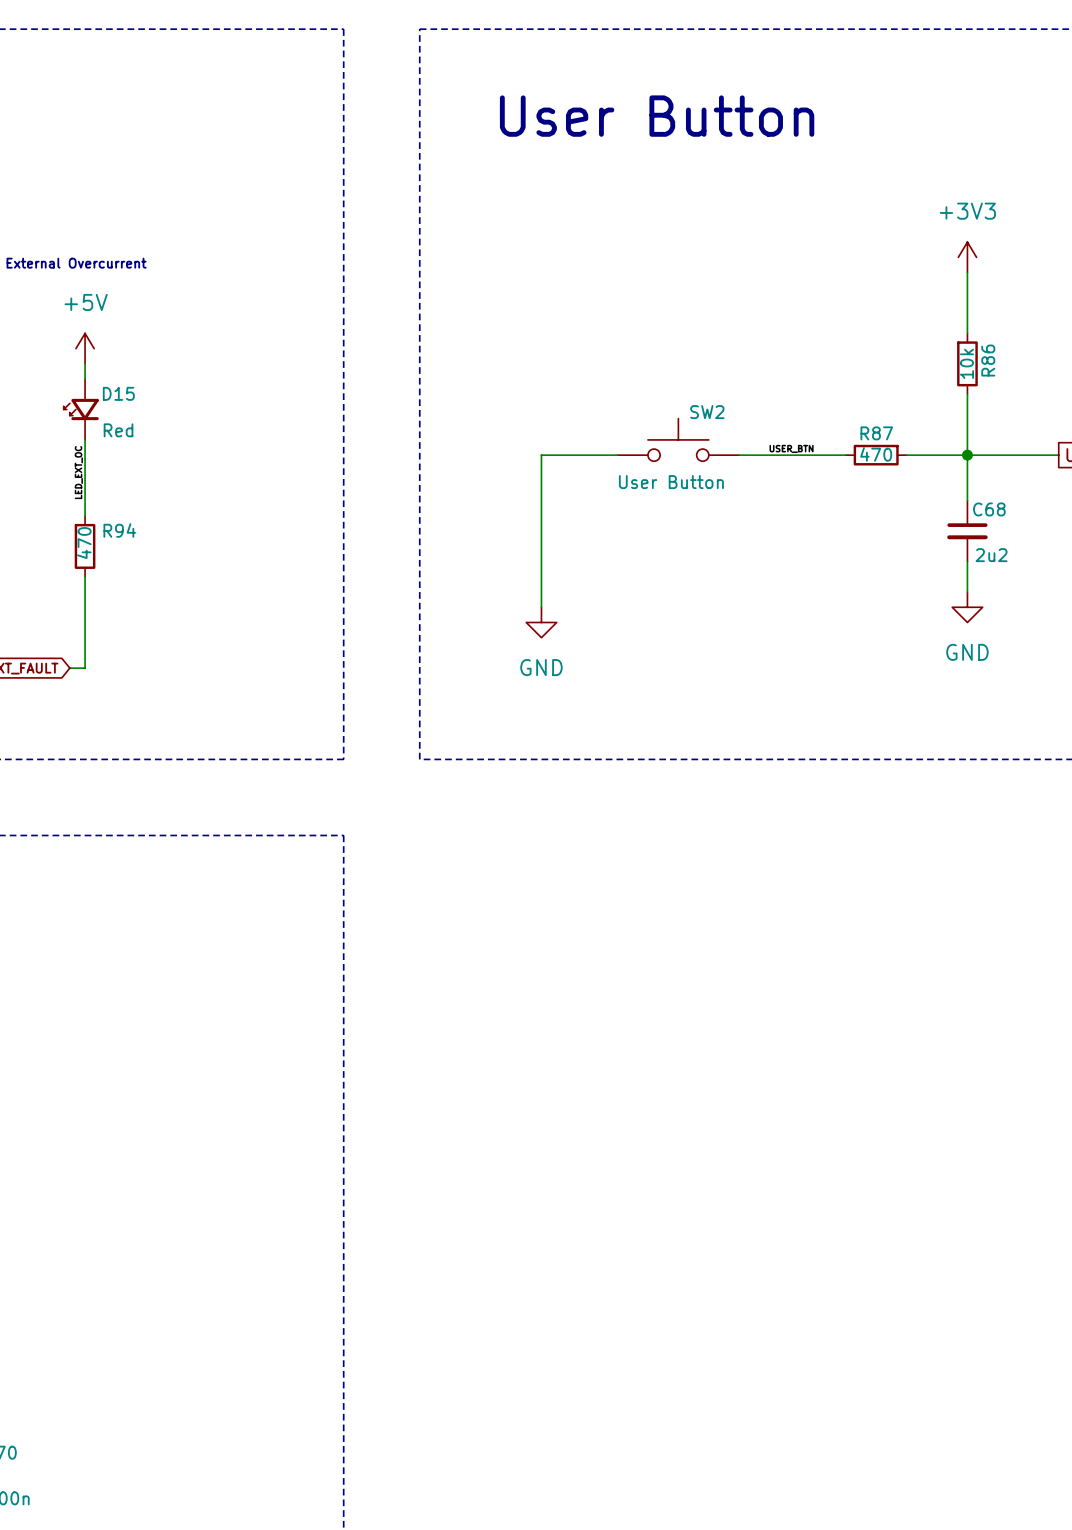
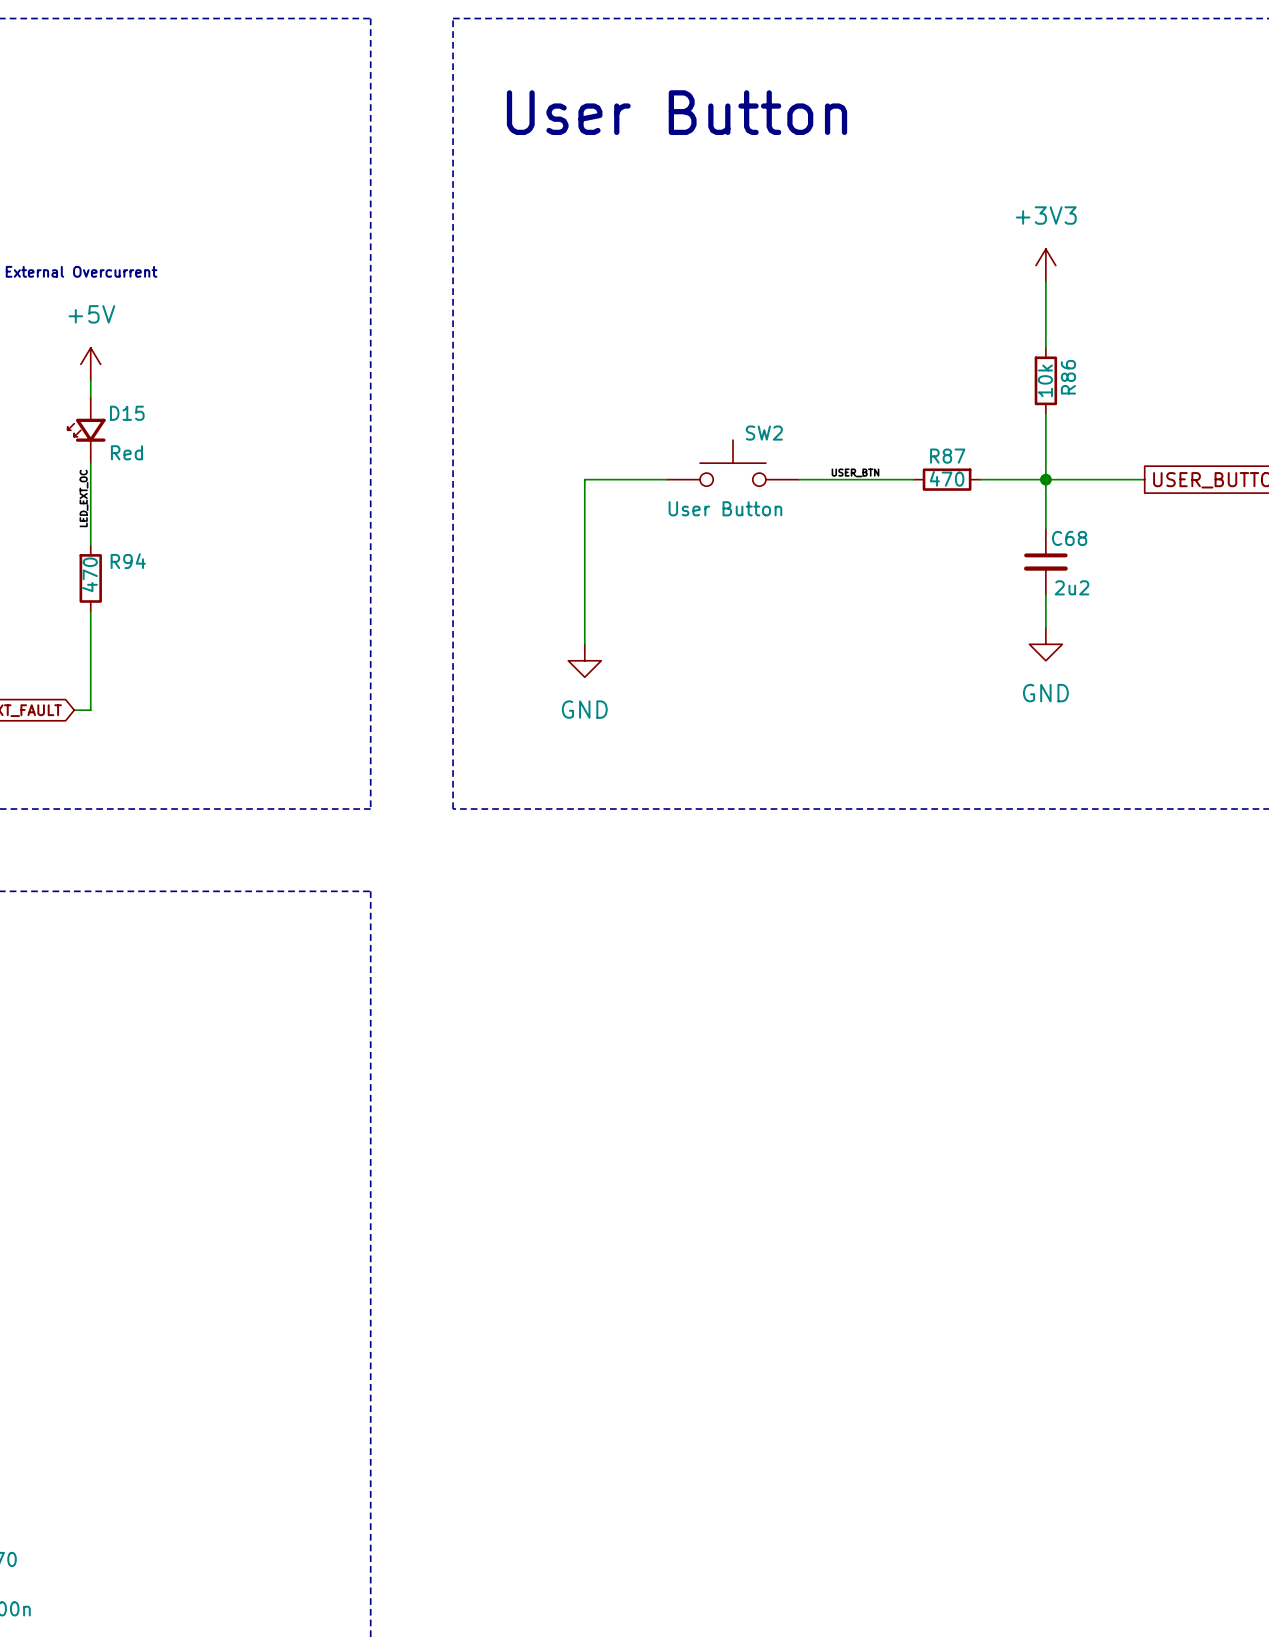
text position: User Button (657, 116) -> User Button (677, 112)

